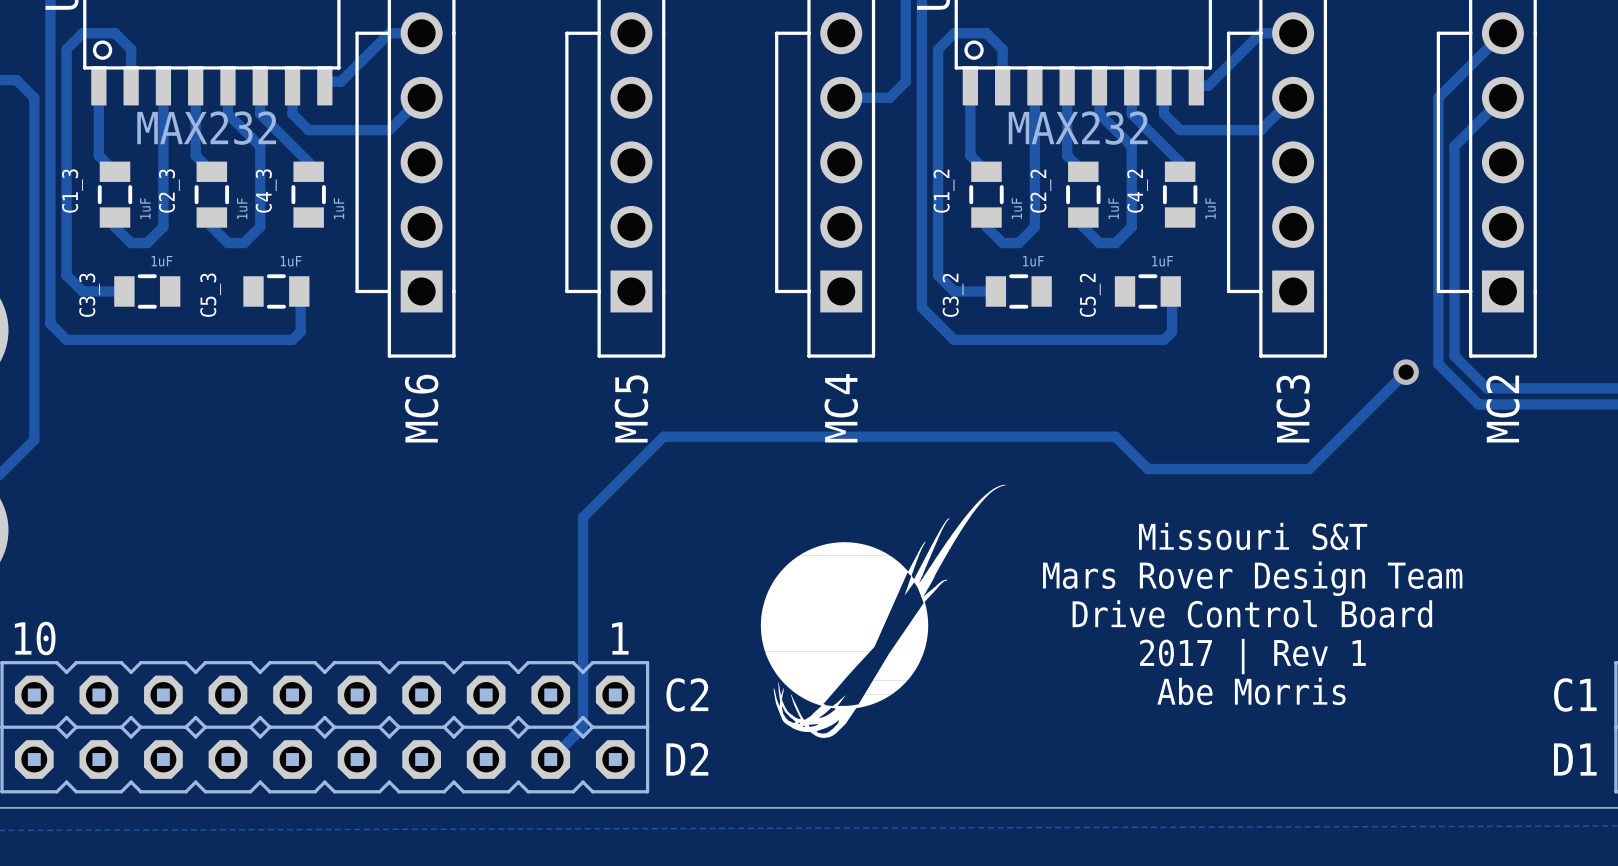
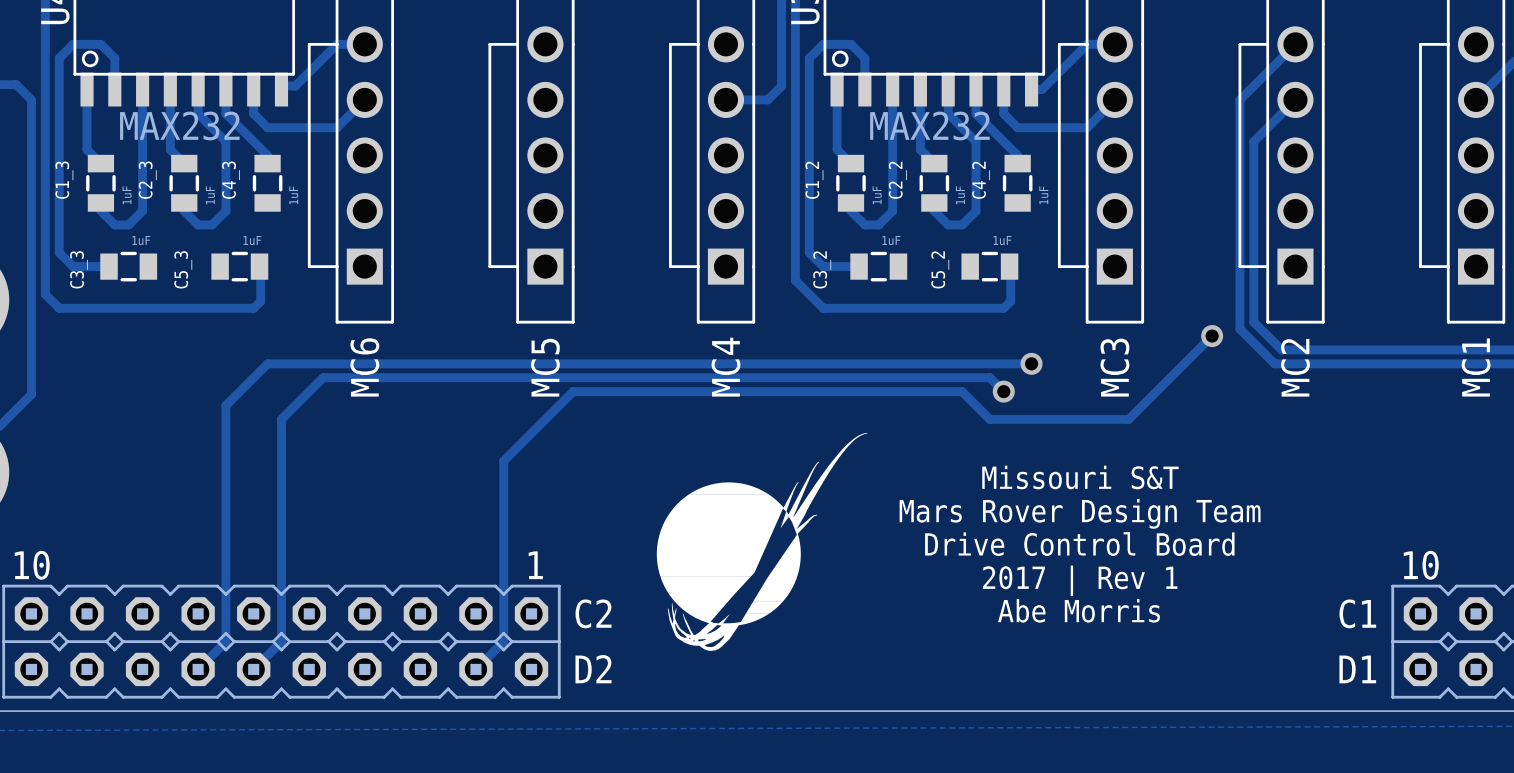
track: none -> (1031, 363) (267, 363) (225, 405) (225, 641) (198, 669)
via: none -> (1031, 363)
track: none -> (1003, 391) (989, 377) (323, 377) (281, 419) (281, 641) (253, 669)
via: none -> (1003, 391)

